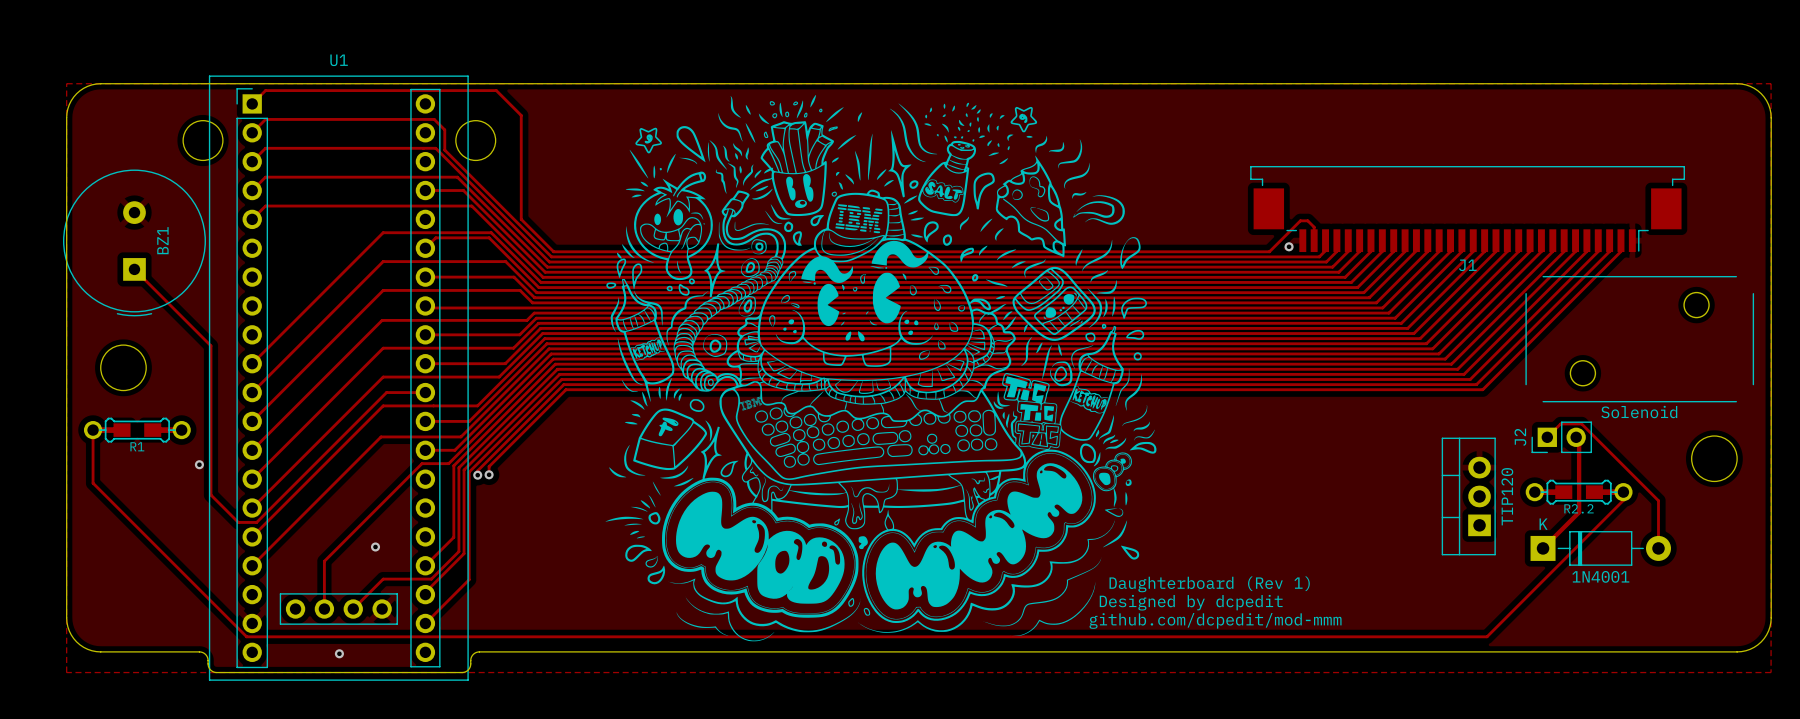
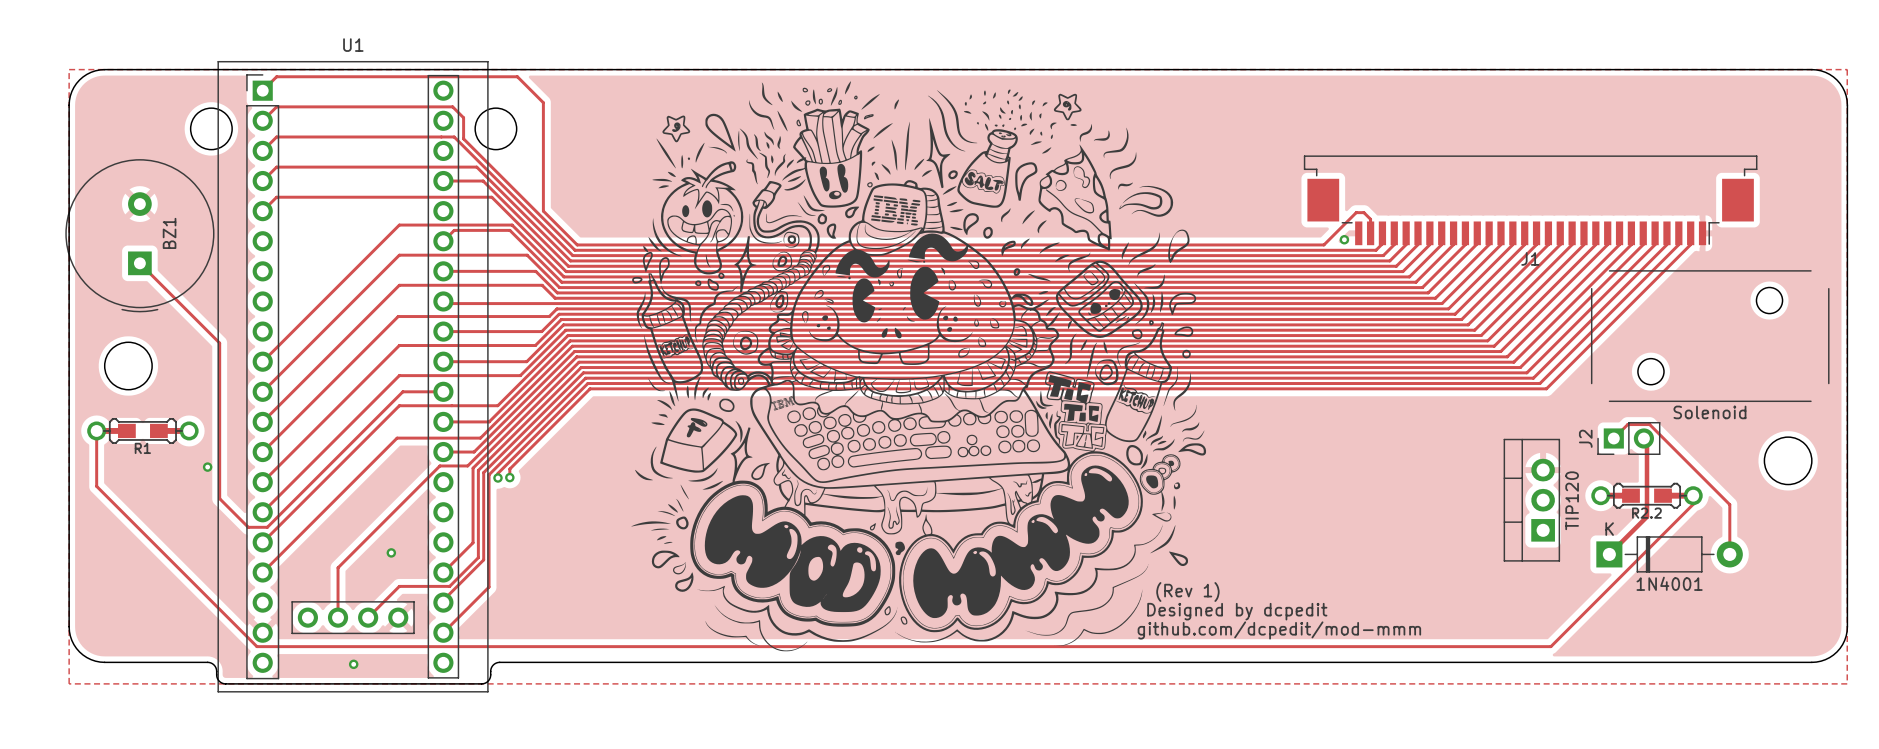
text: Daughterboard (Rev 1) (1209, 584) -> (Rev 1) (1187, 592)

